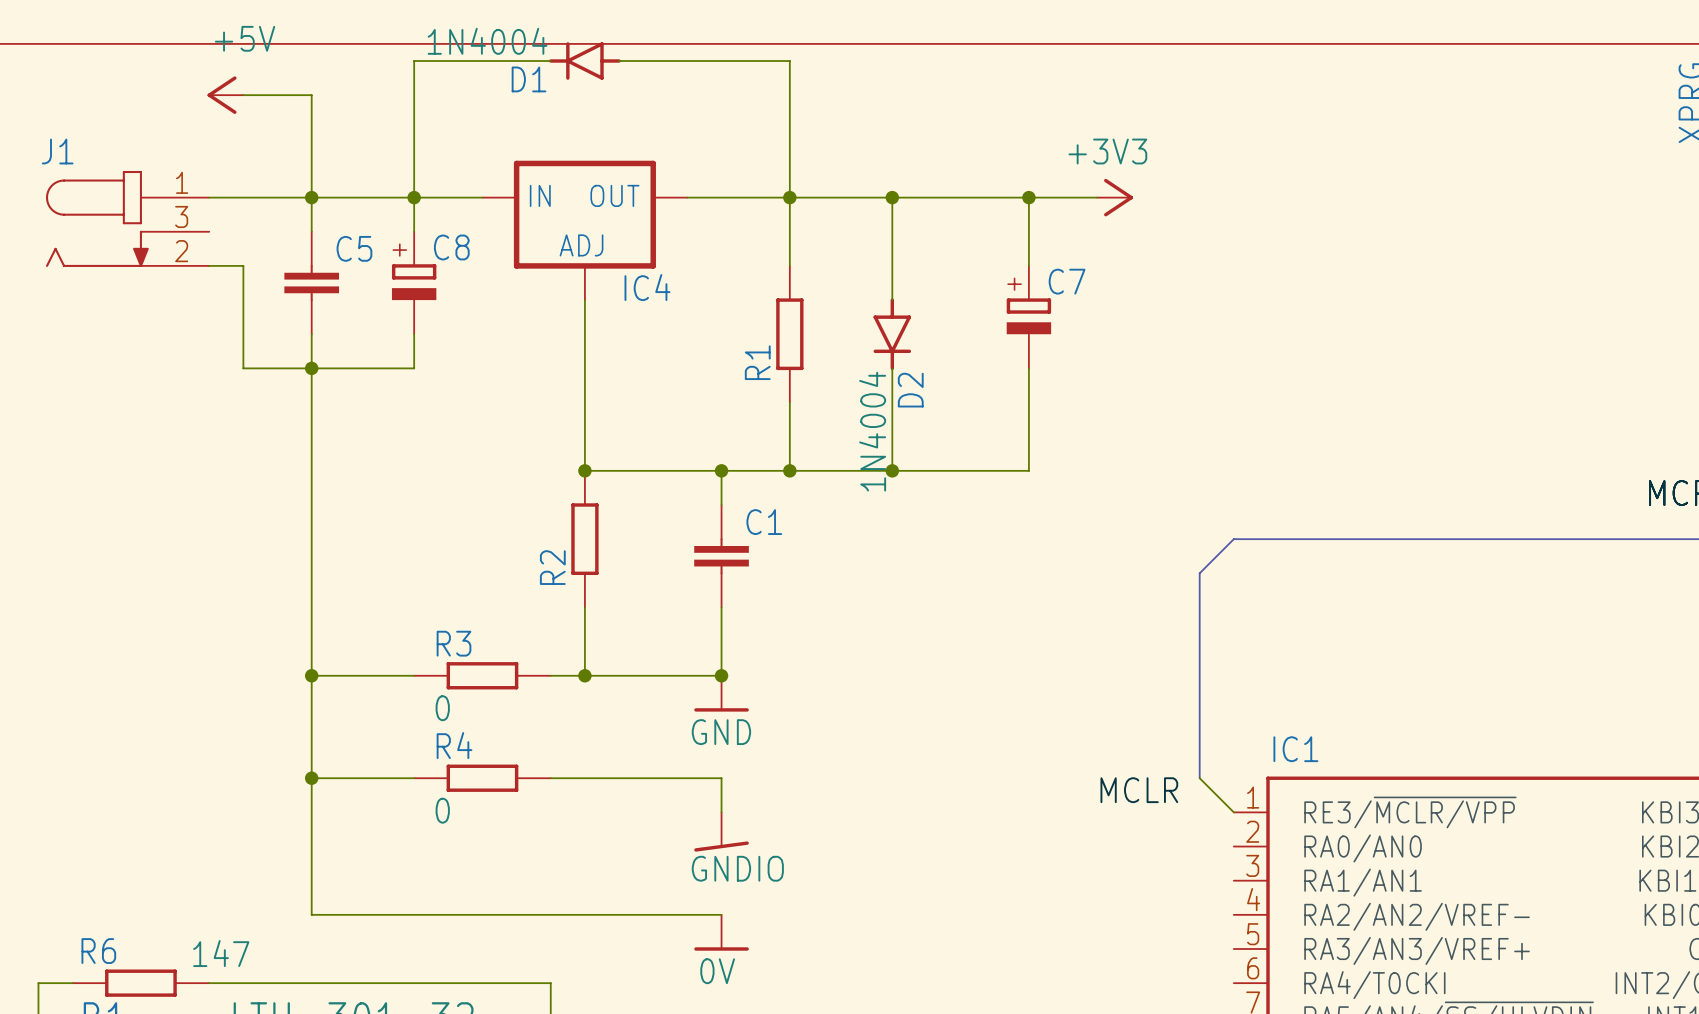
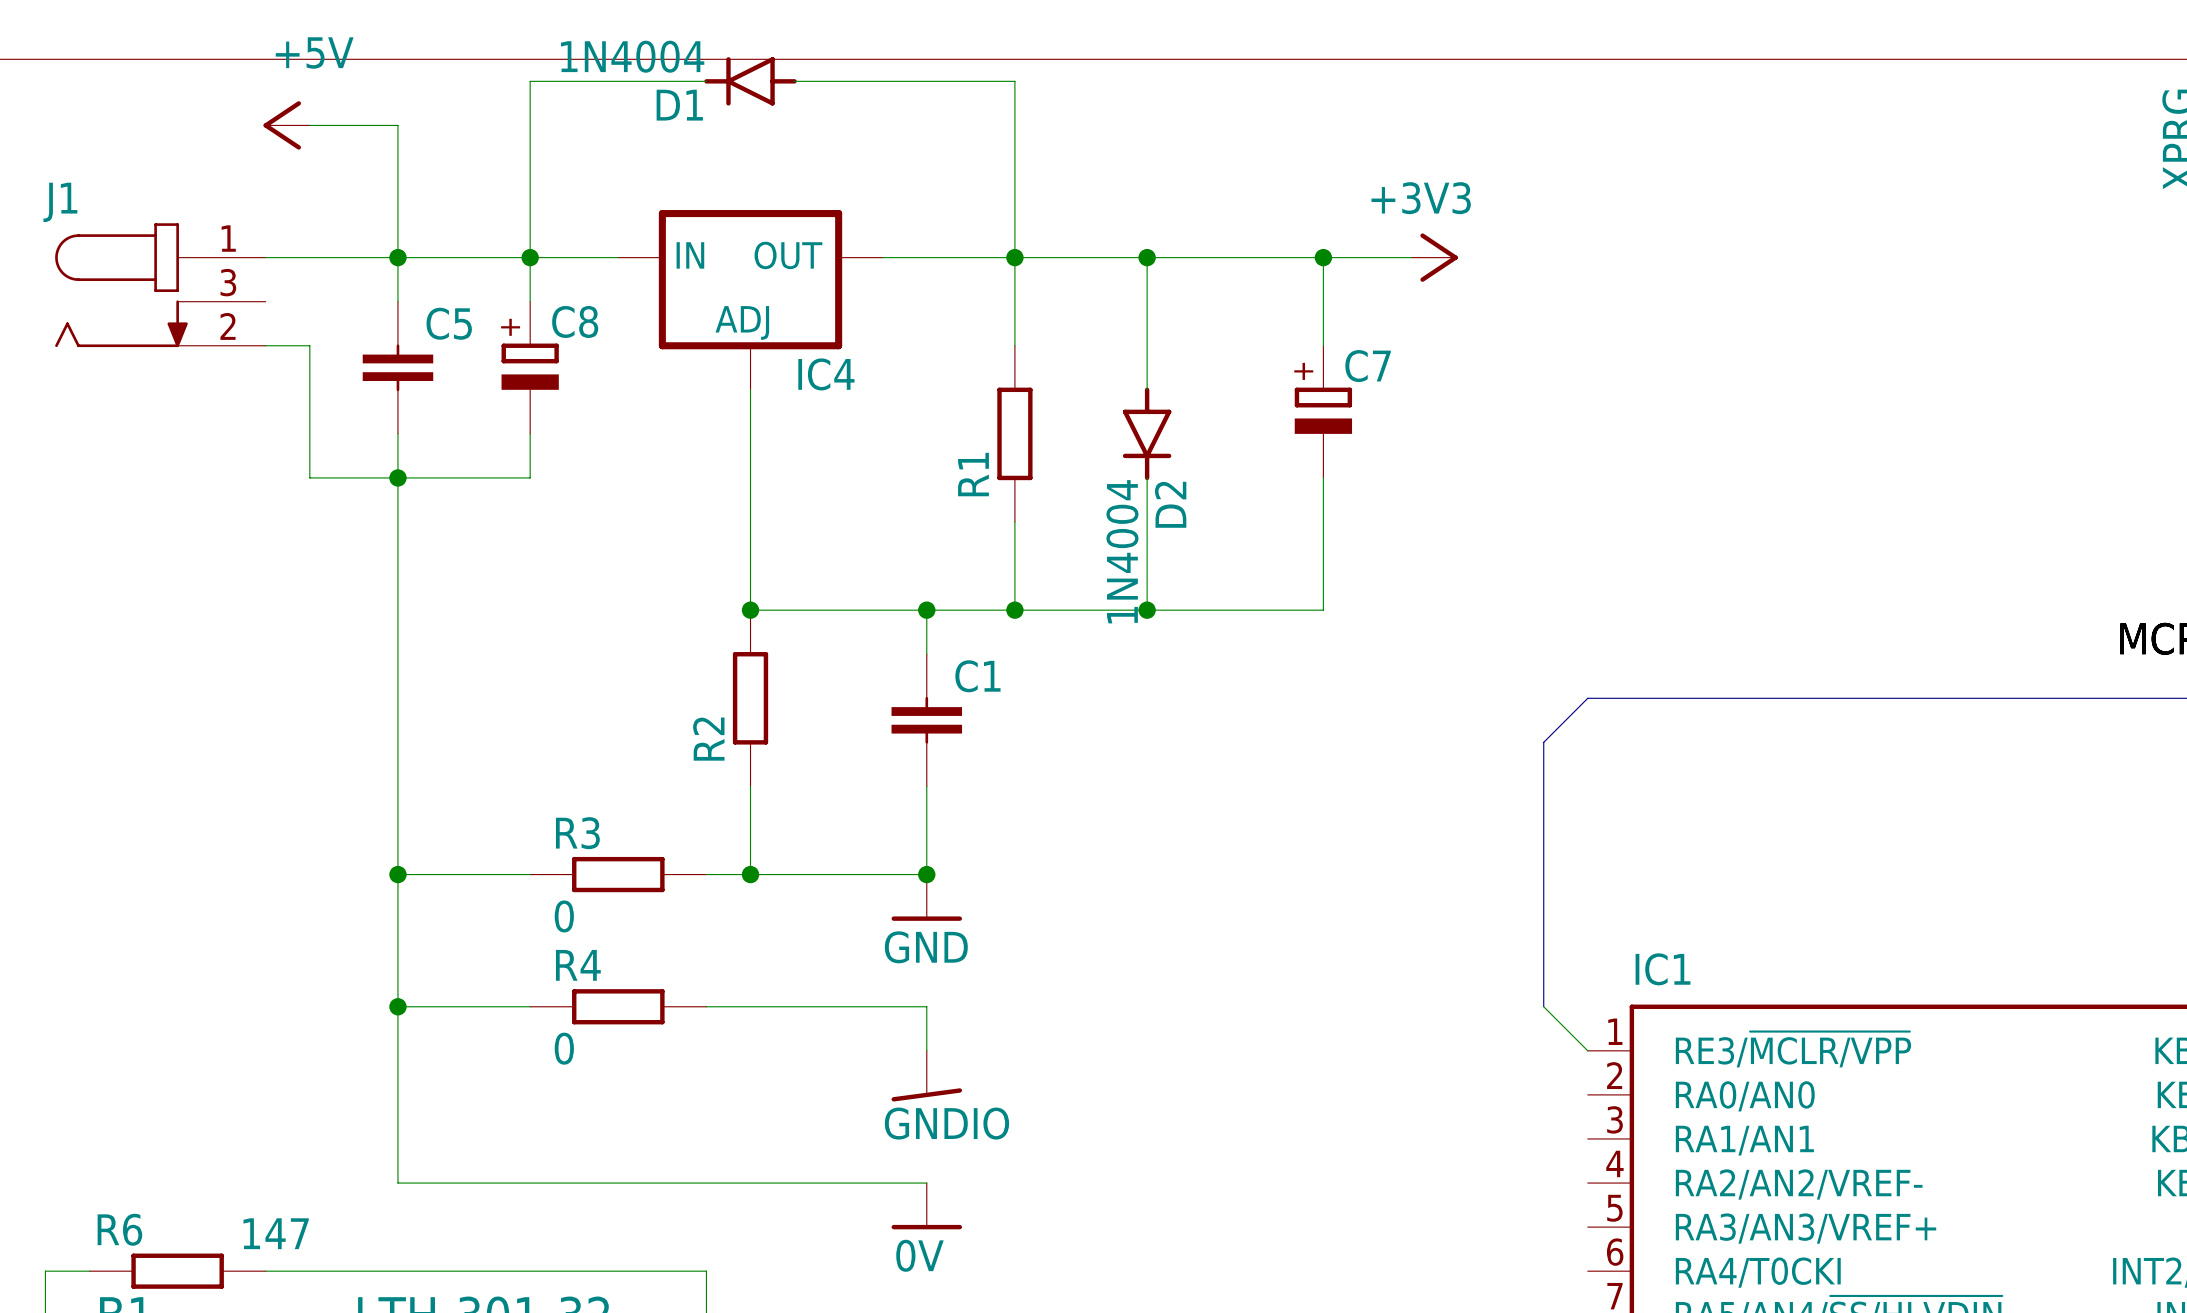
label: MCLR (1139, 790) -> none

